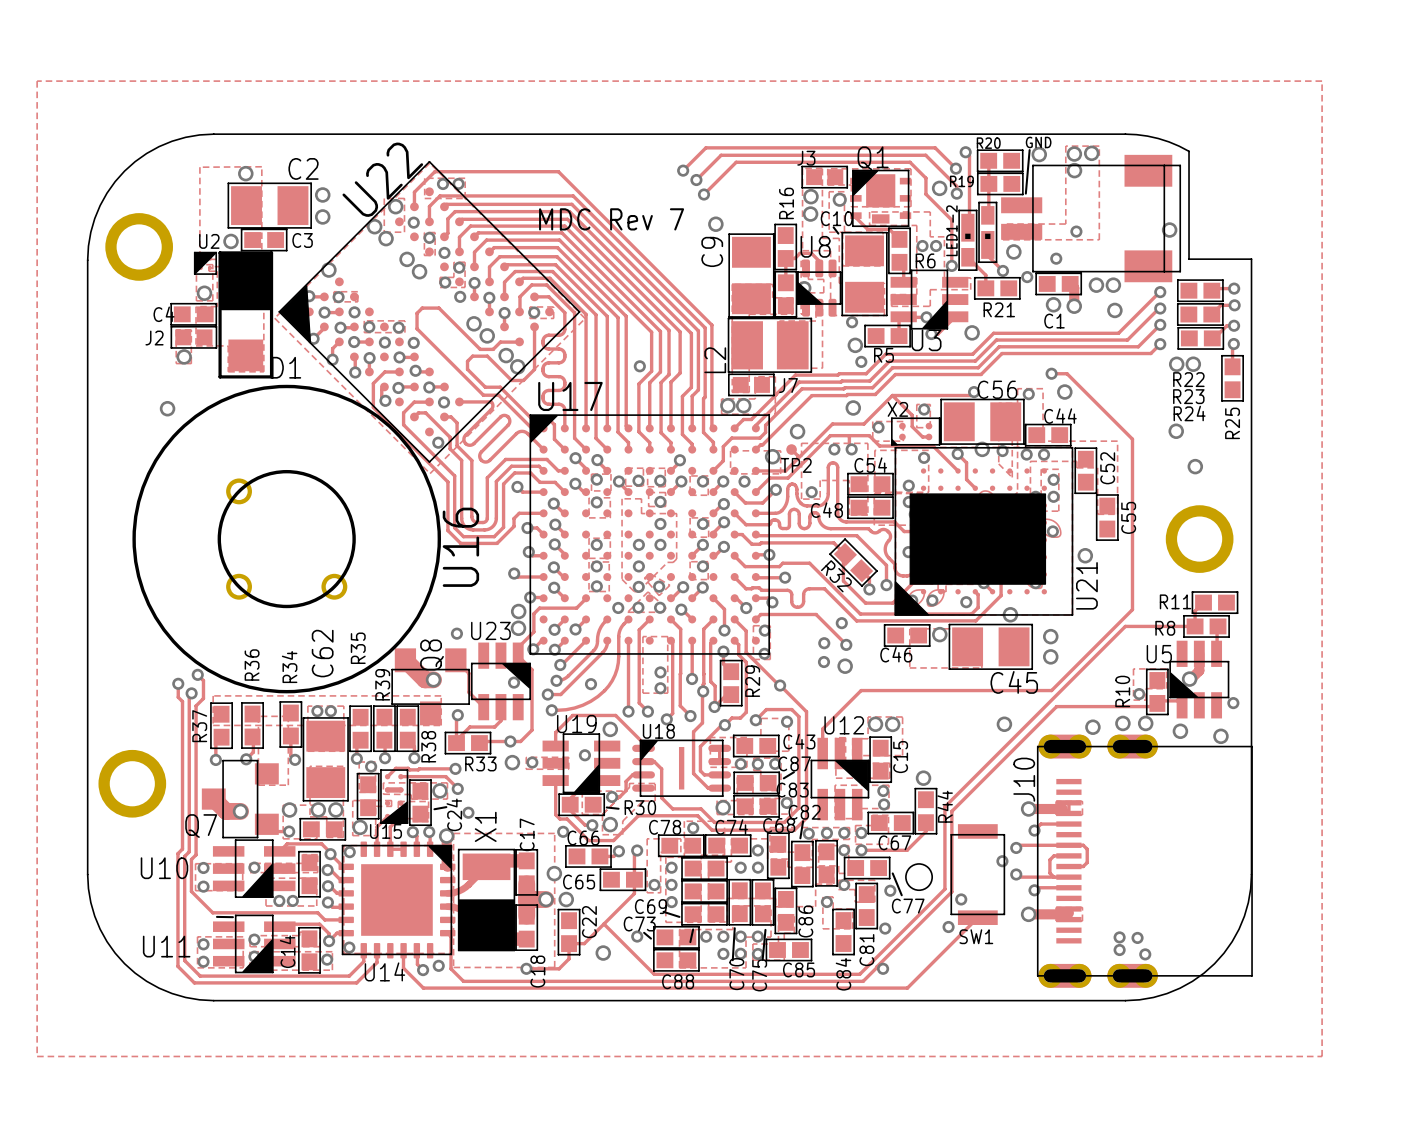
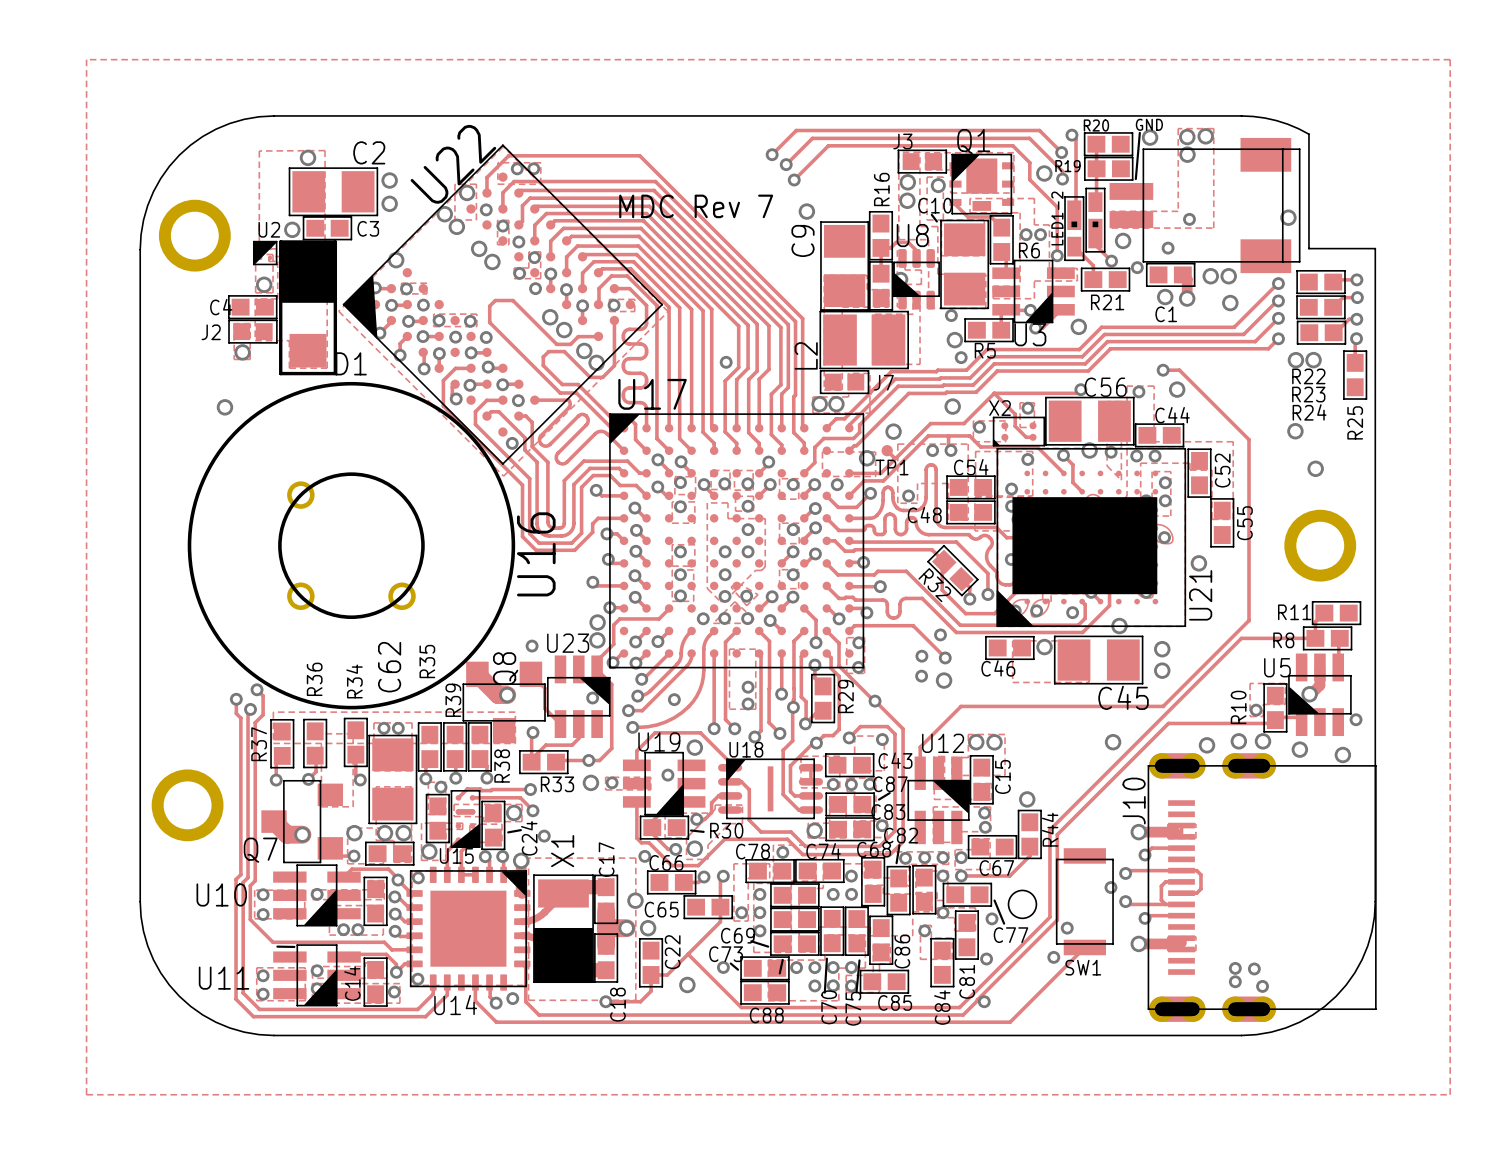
TP2 name: TP2 (796, 465) -> TP1 (892, 467)

